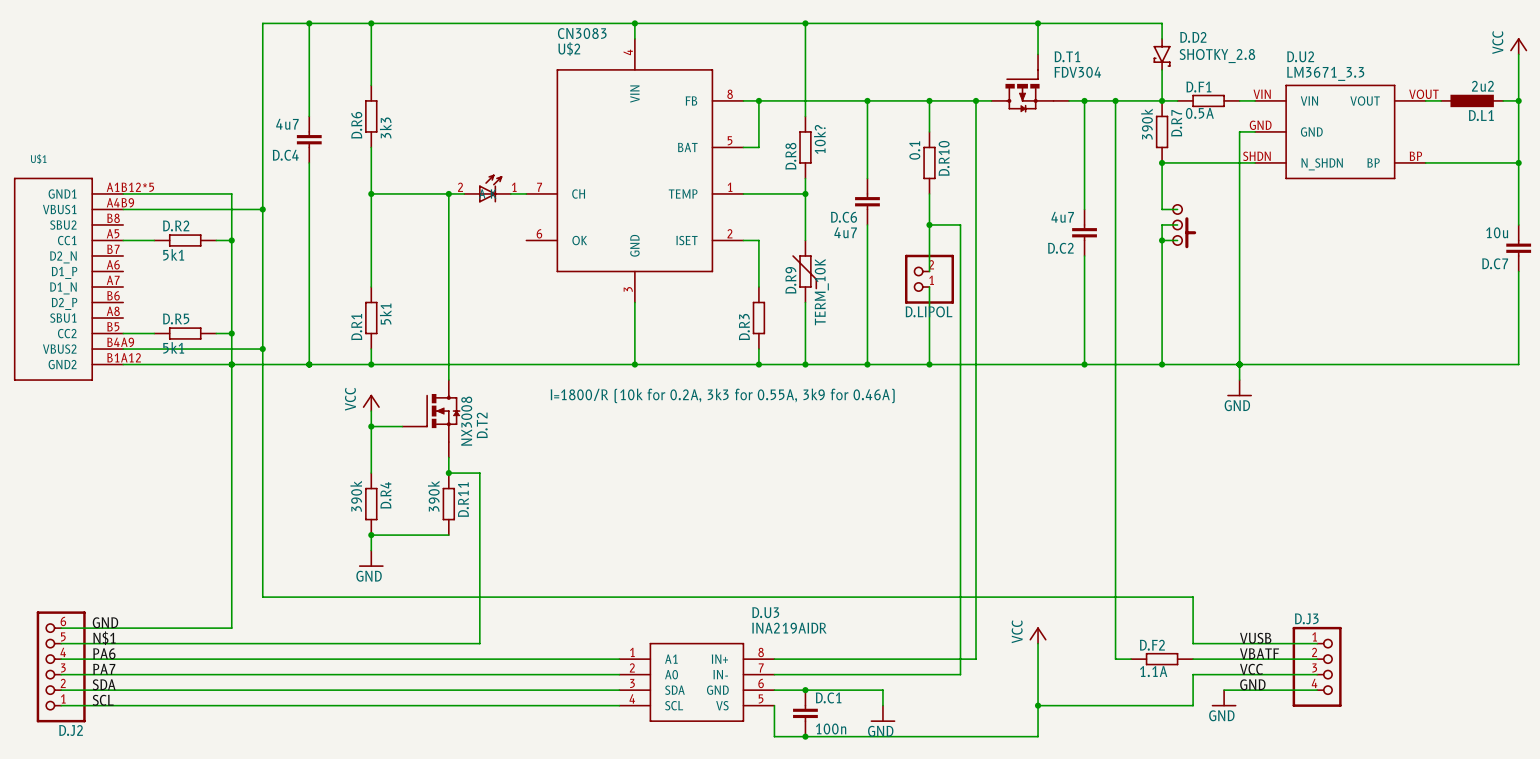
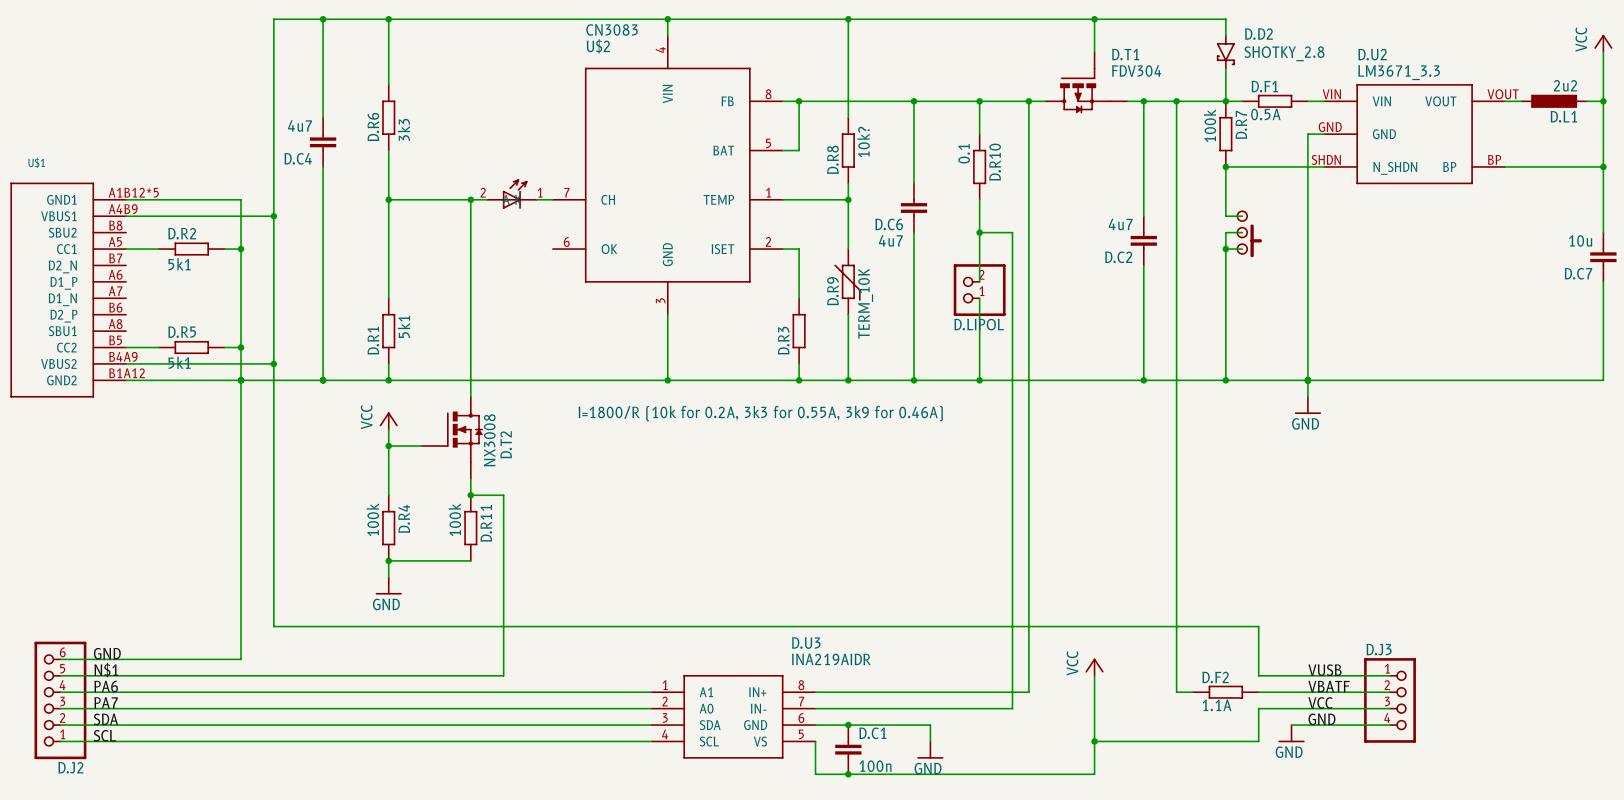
D.R7 value: 390k (1147, 124) -> 100k (1209, 125)
D.R4 value: 390k (356, 496) -> 100k (372, 519)
D.R11 value: 390k (433, 496) -> 100k (454, 519)

